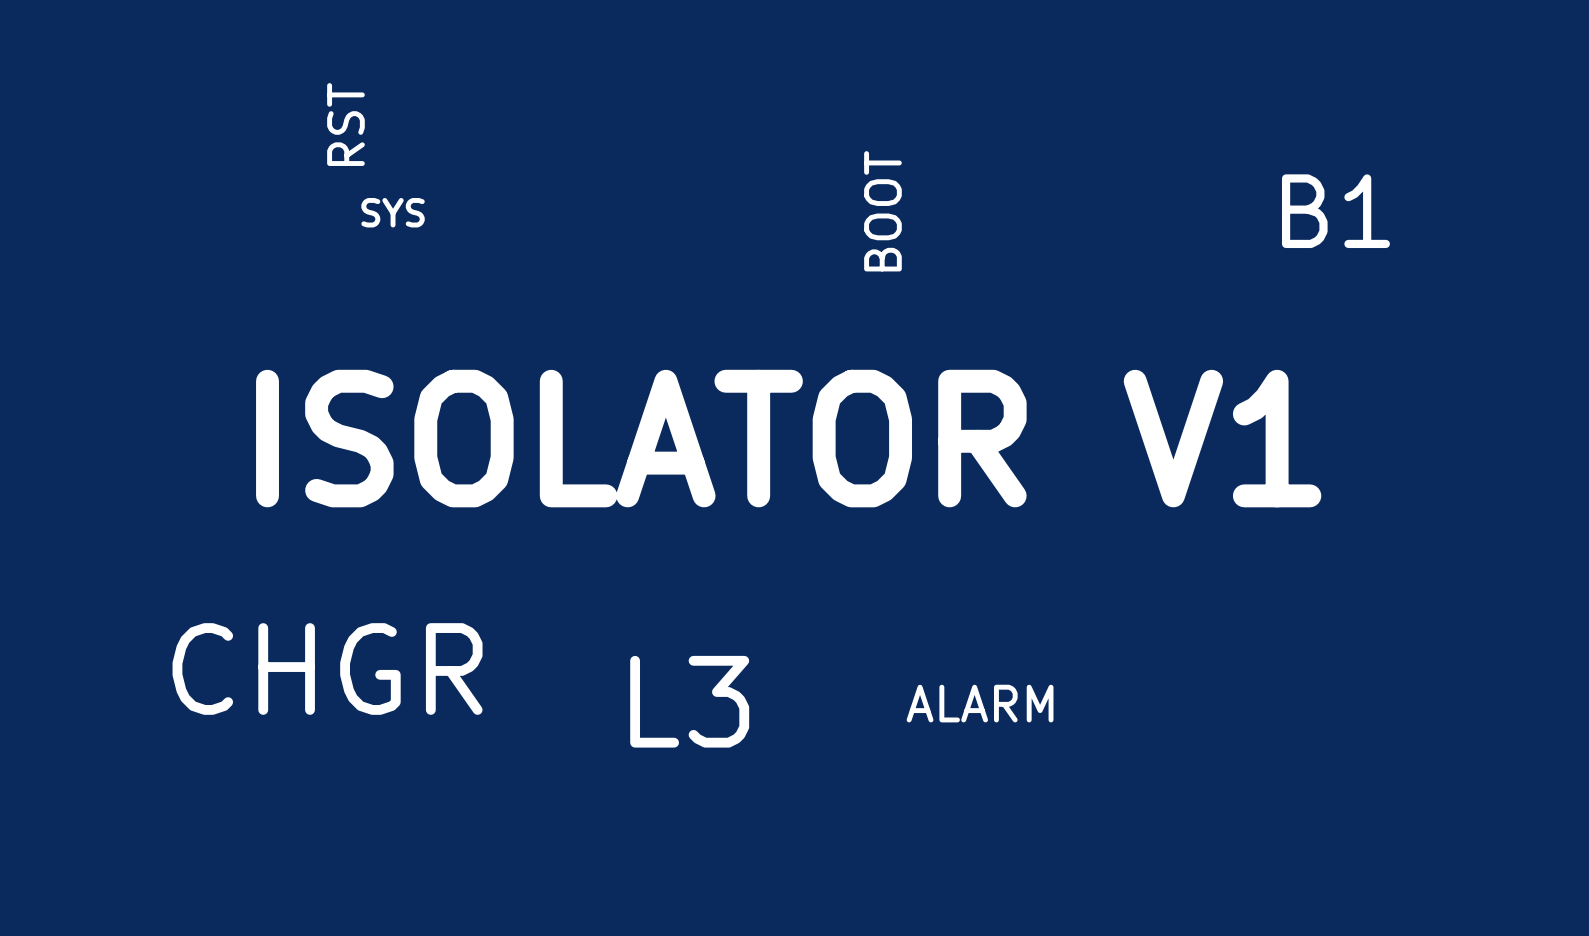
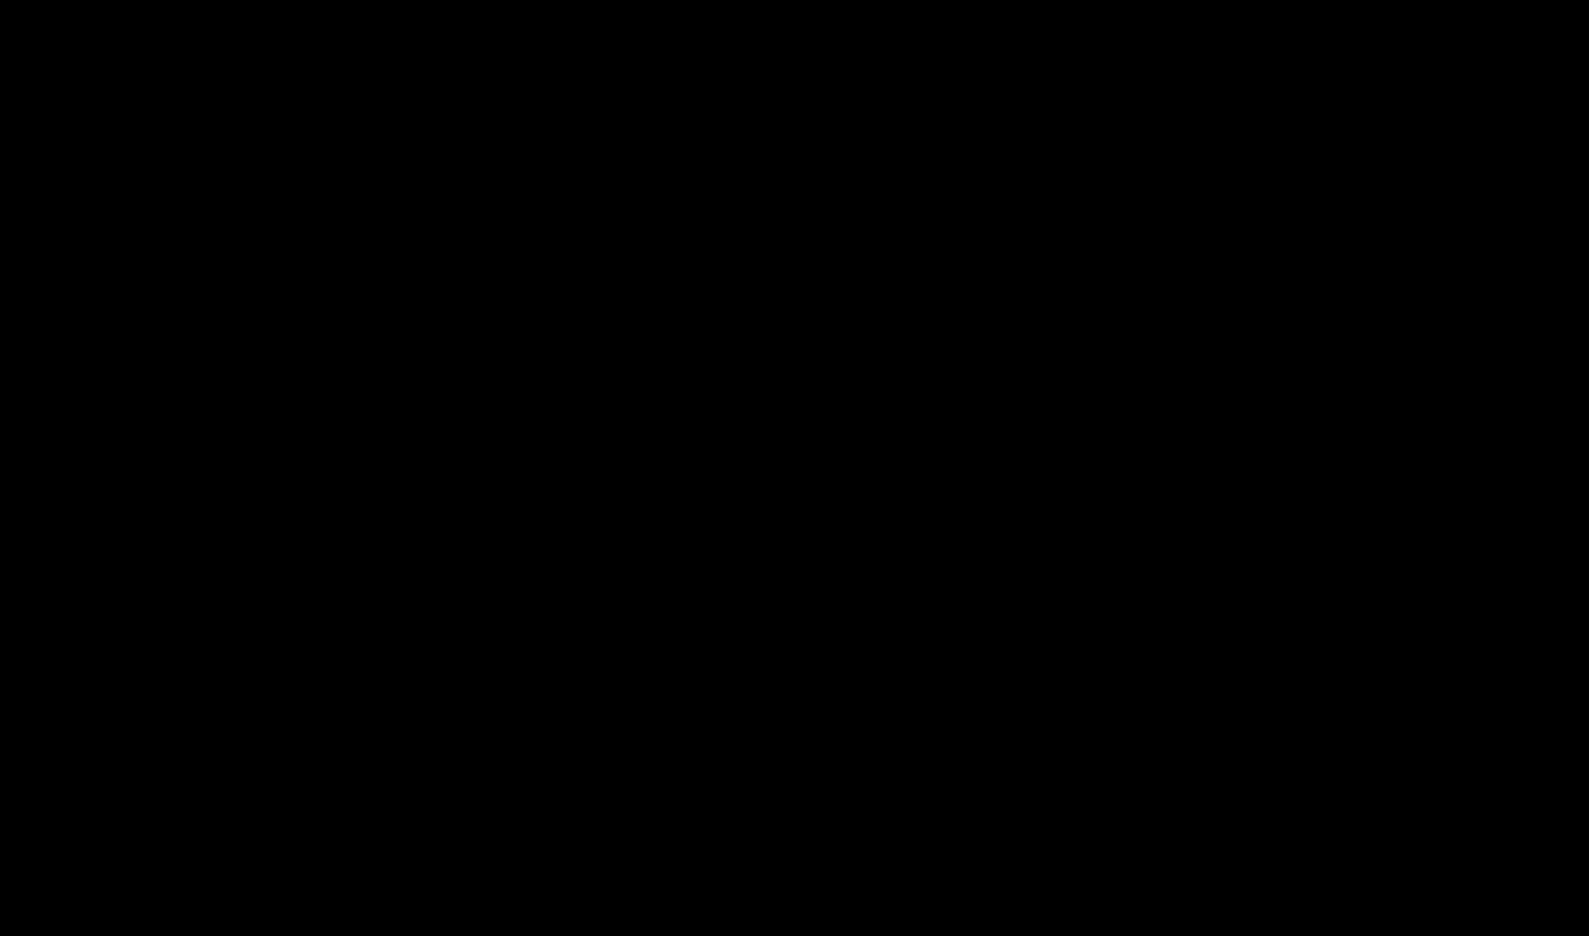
text: RST (345, 124) -> none
text: BOOT (882, 211) -> none
text: B1 (1335, 211) -> none
text: SYS (393, 212) -> none
text: ISOLATOR V1 (788, 438) -> none
text: CHGR (327, 668) -> none
text: L3 (689, 701) -> none
text: ALARM (980, 703) -> none

